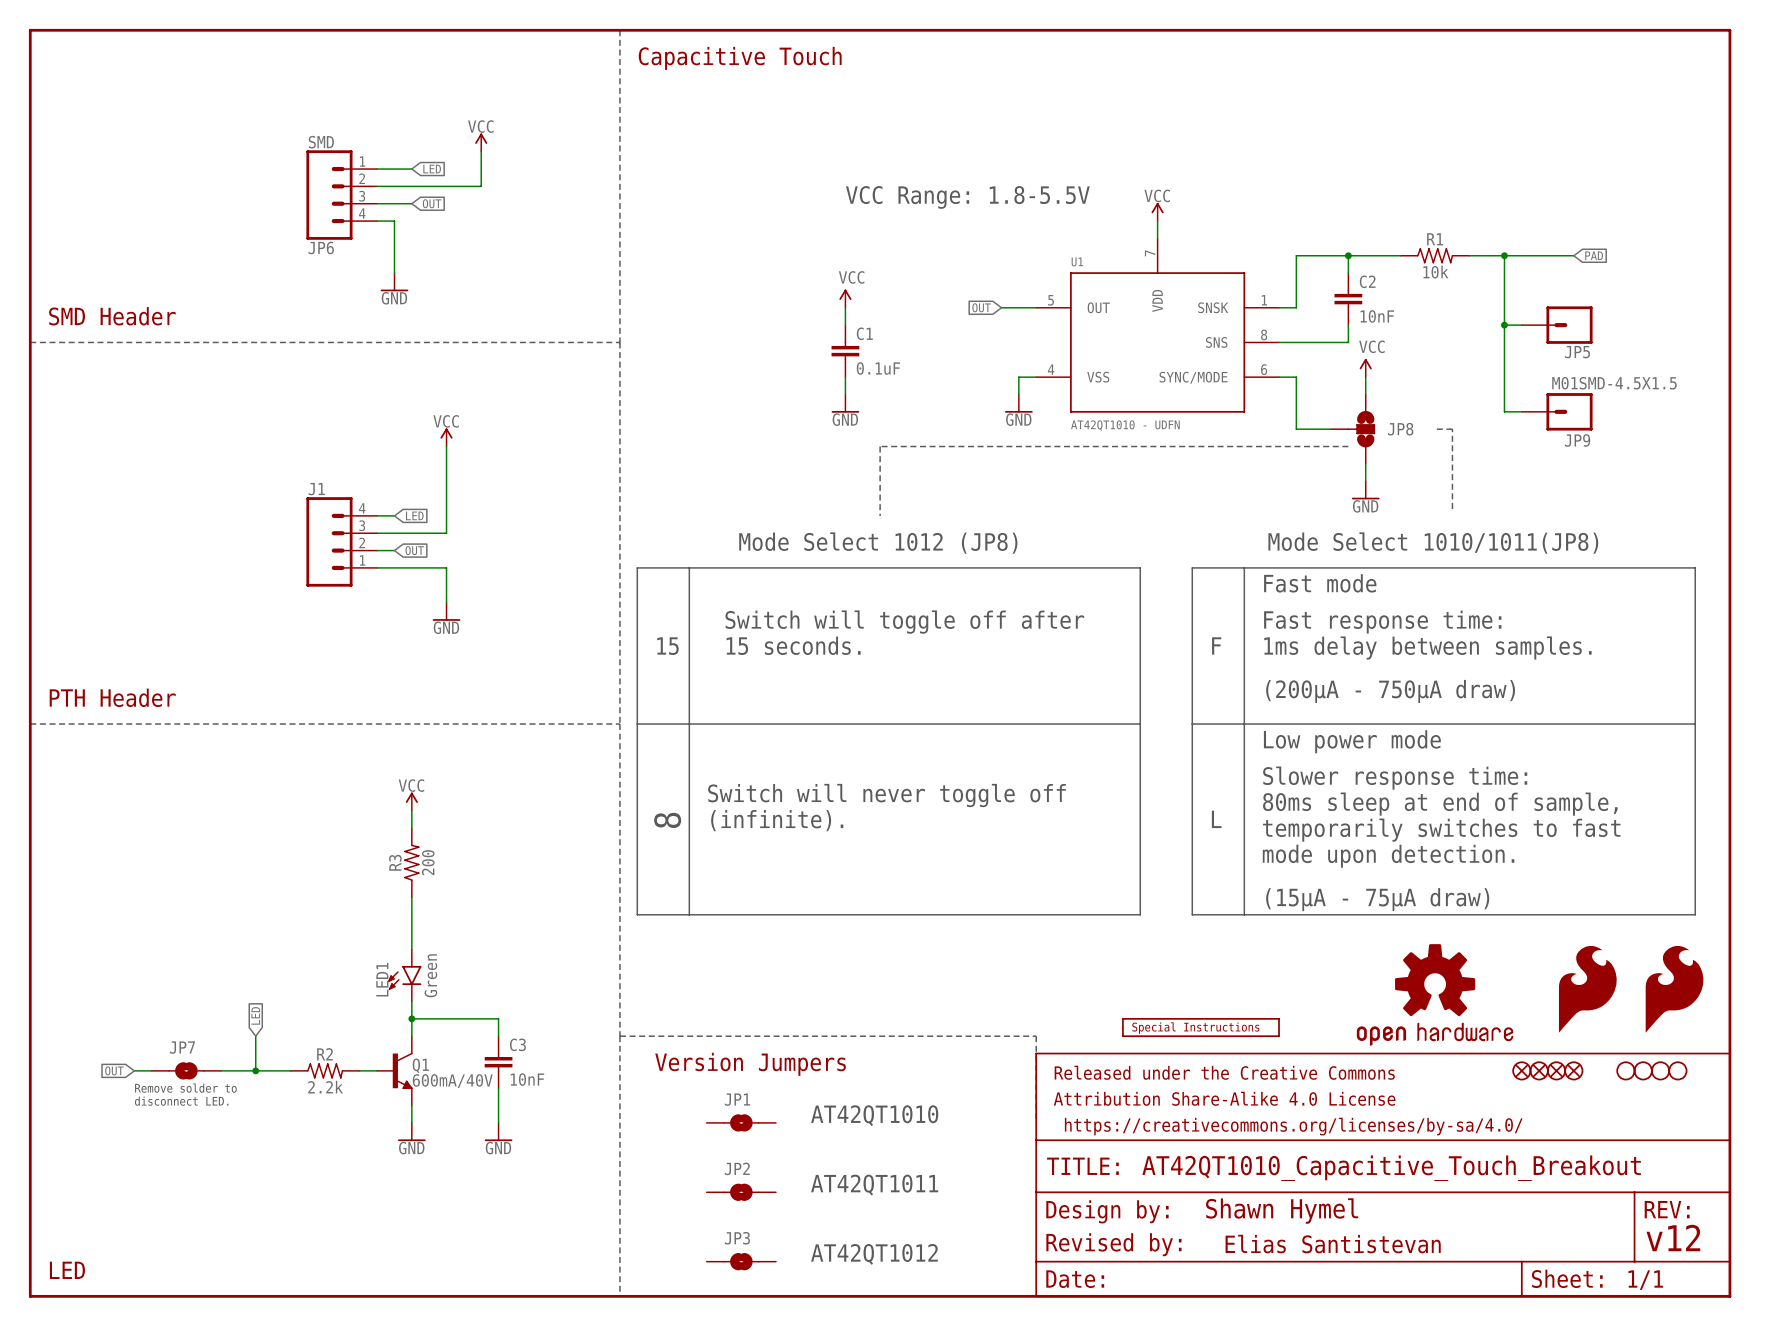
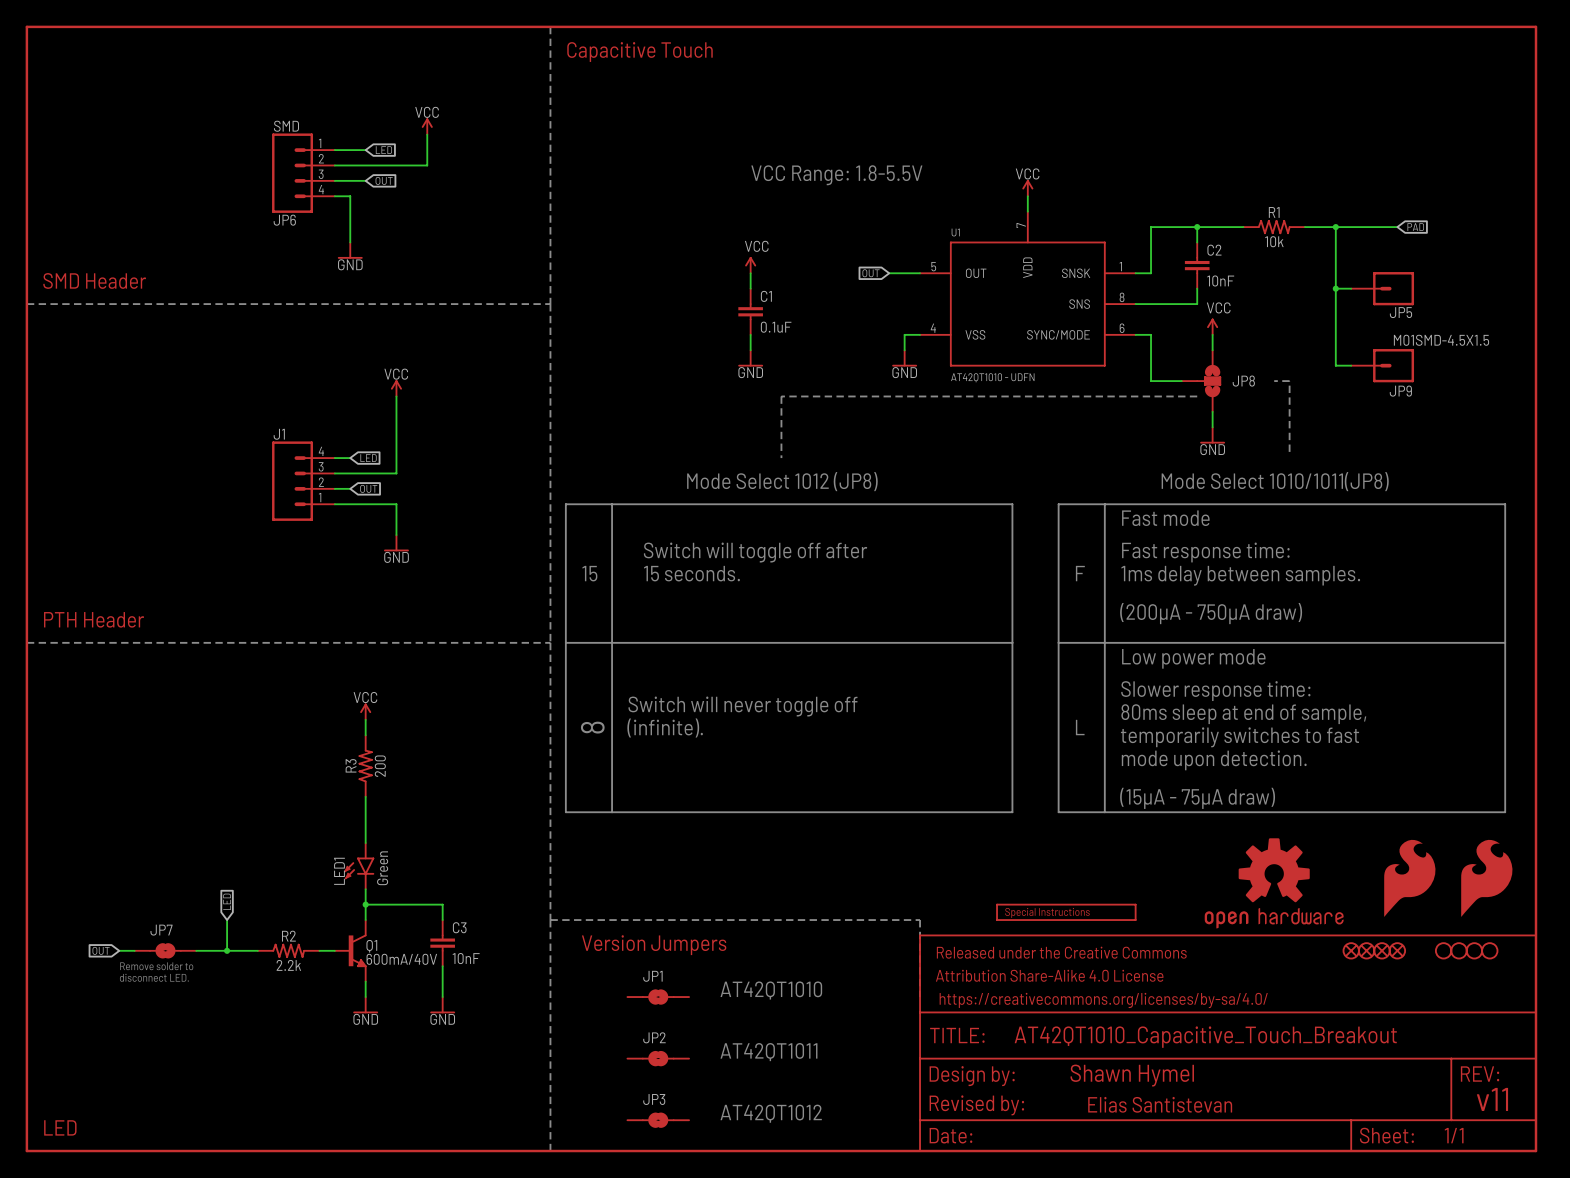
text: v12 (1673, 1238) -> v11 (1492, 1099)

